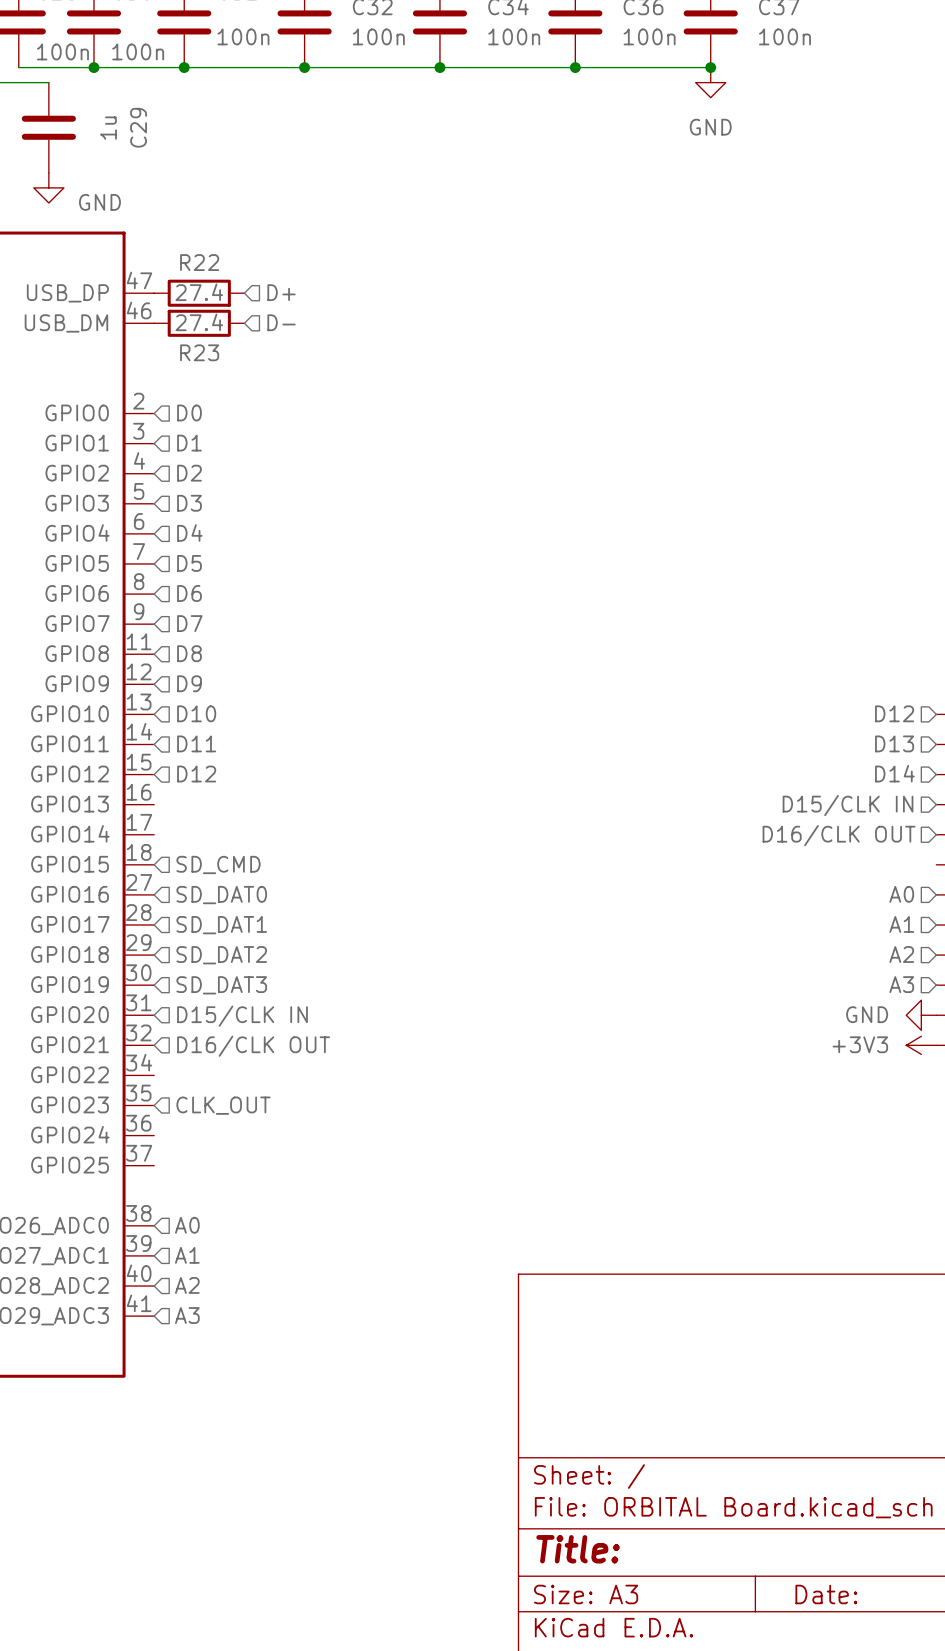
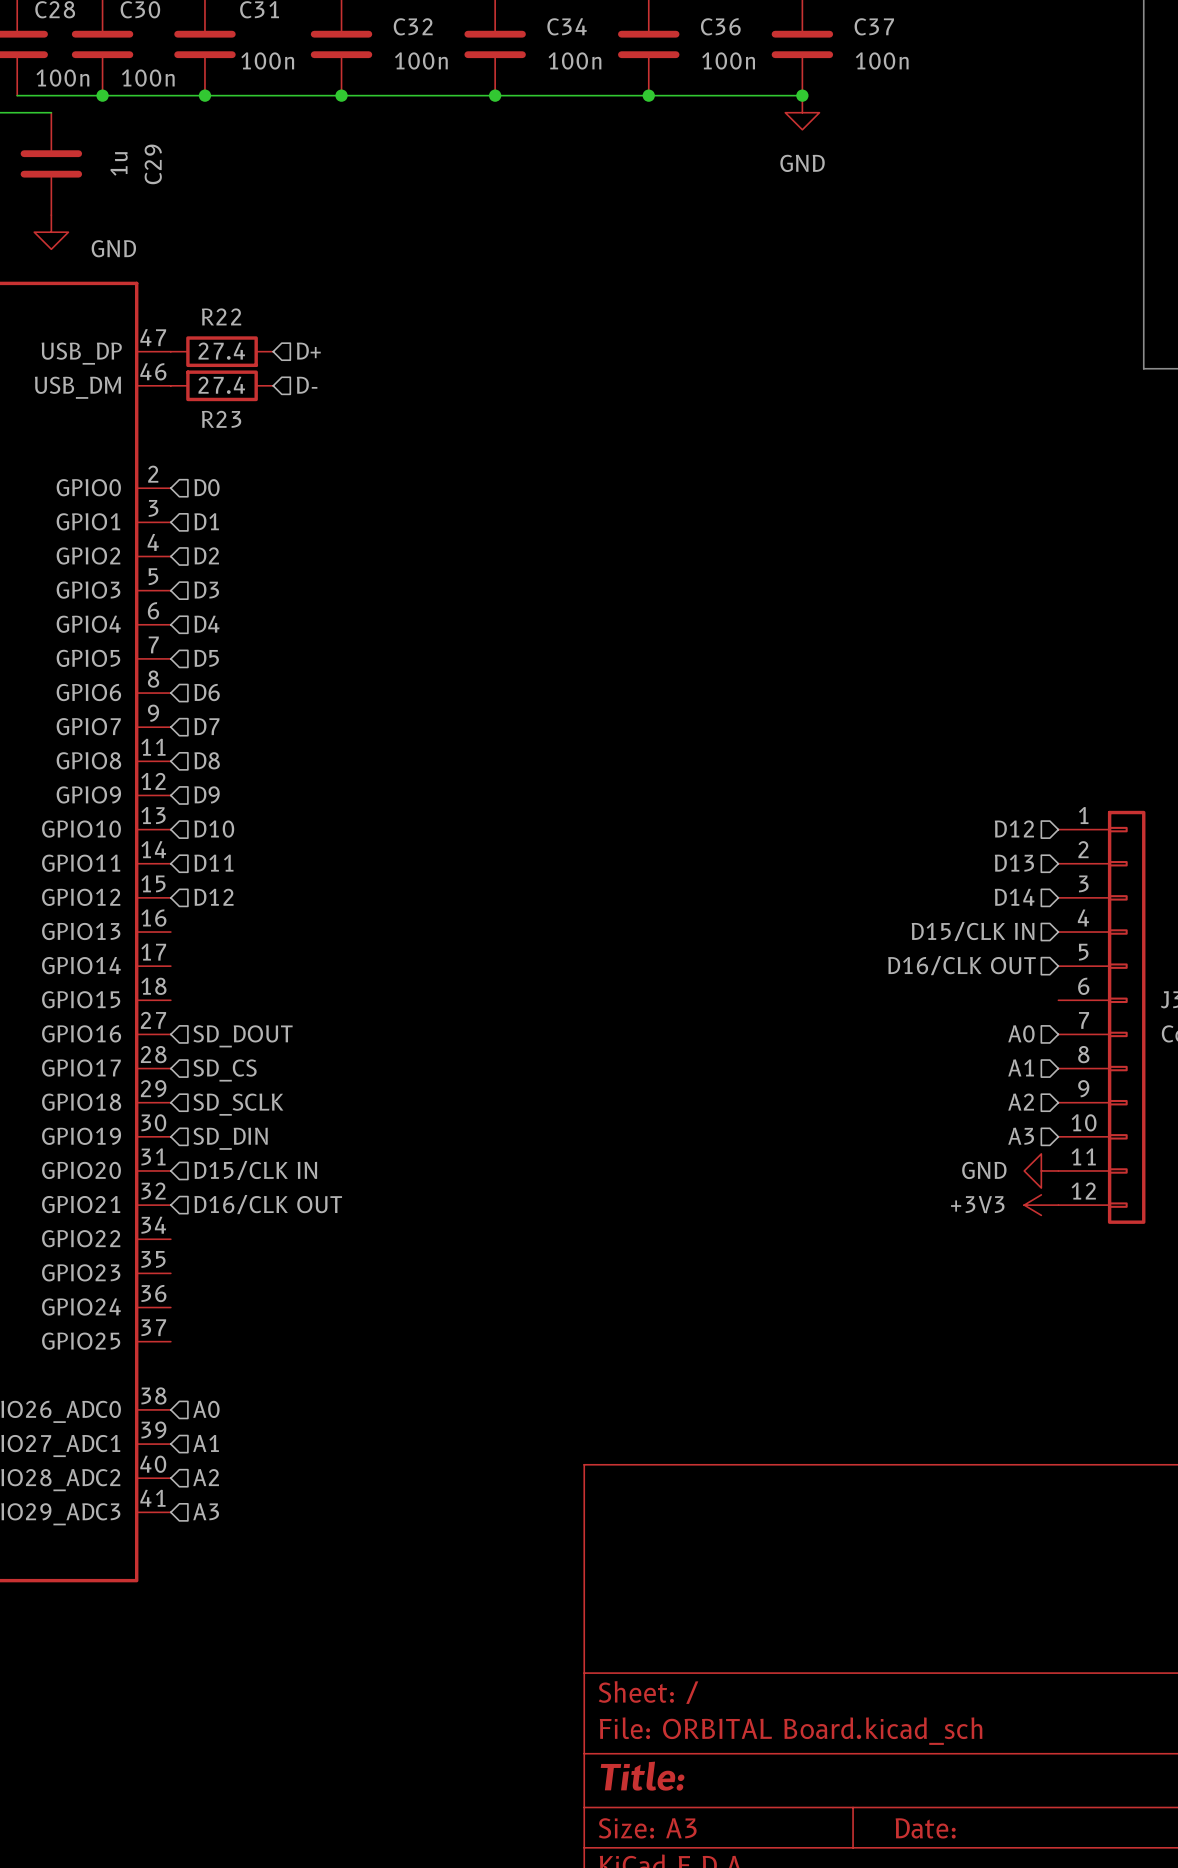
hierarchical label: SD_CMD (218, 864) -> none
hierarchical label: SD_DAT0 (221, 895) -> SD_DOUT (243, 1036)
hierarchical label: SD_DAT1 (221, 925) -> SD_CS (225, 1070)
hierarchical label: SD_DAT2 (221, 955) -> SD_SCLK (238, 1104)
hierarchical label: SD_DAT3 (221, 985) -> SD_DIN (230, 1138)
hierarchical label: CLK_OUT (223, 1105) -> none

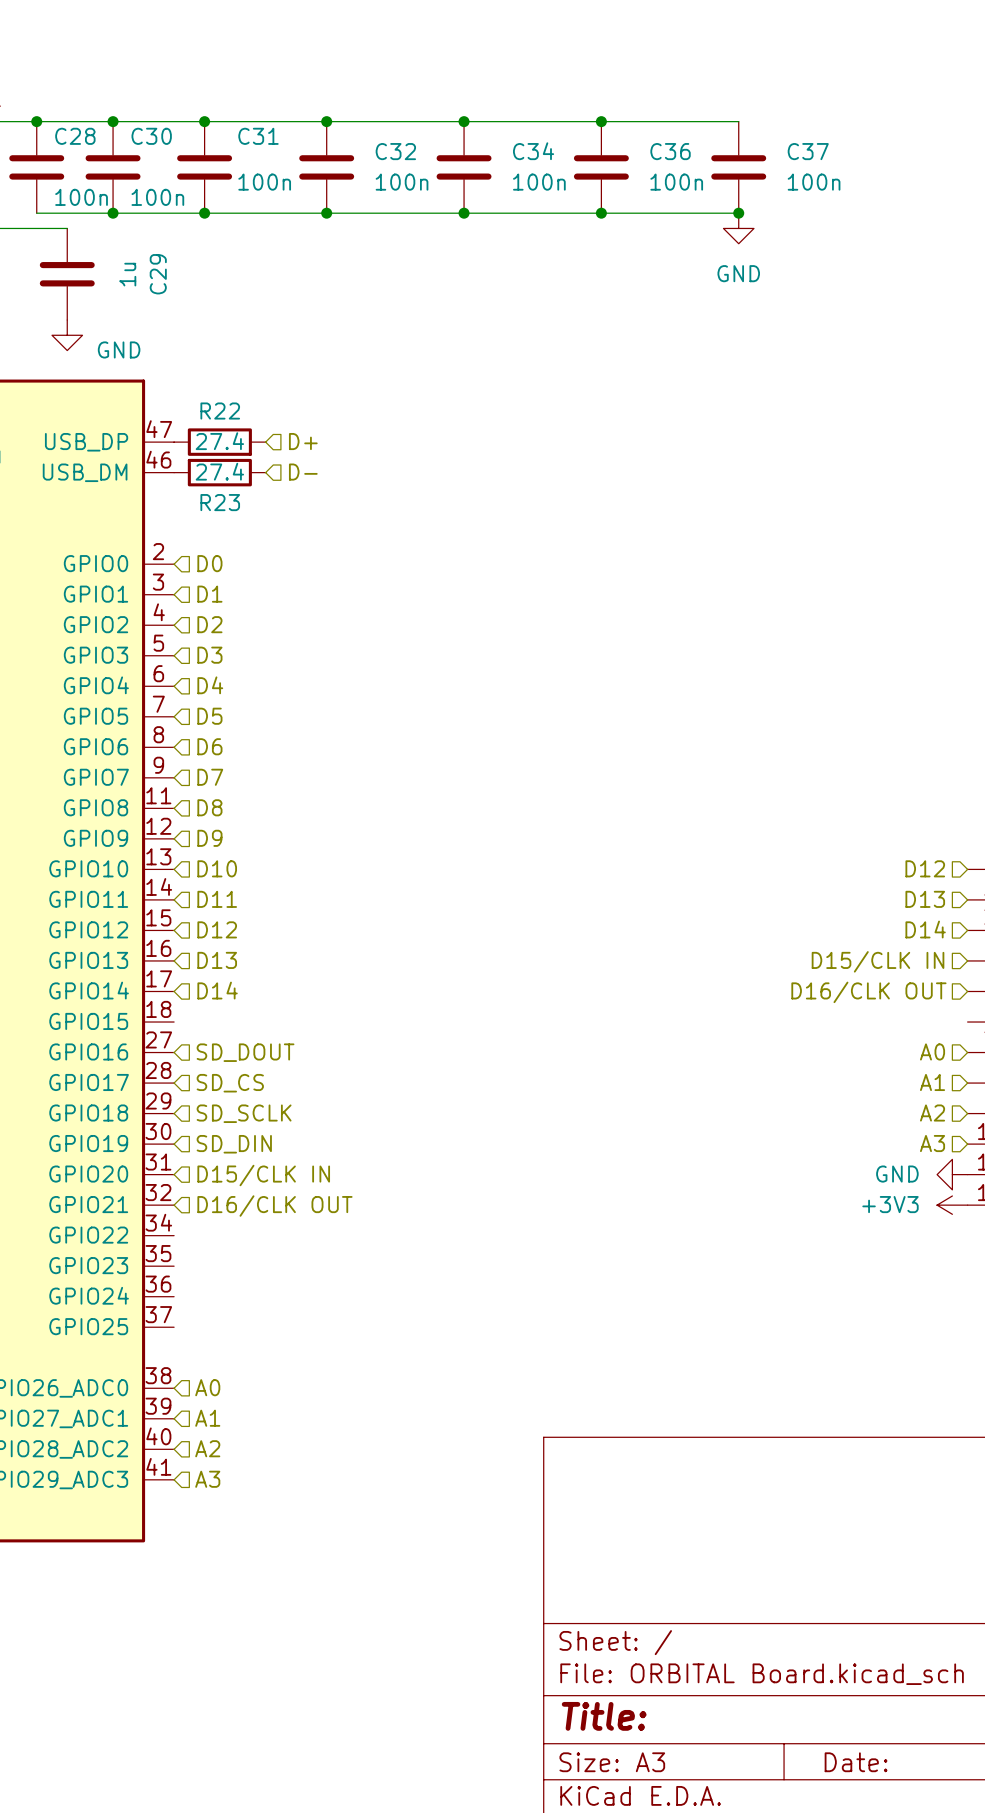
hierarchical label: none -> D13 (217, 960)
hierarchical label: none -> D14 (217, 990)

